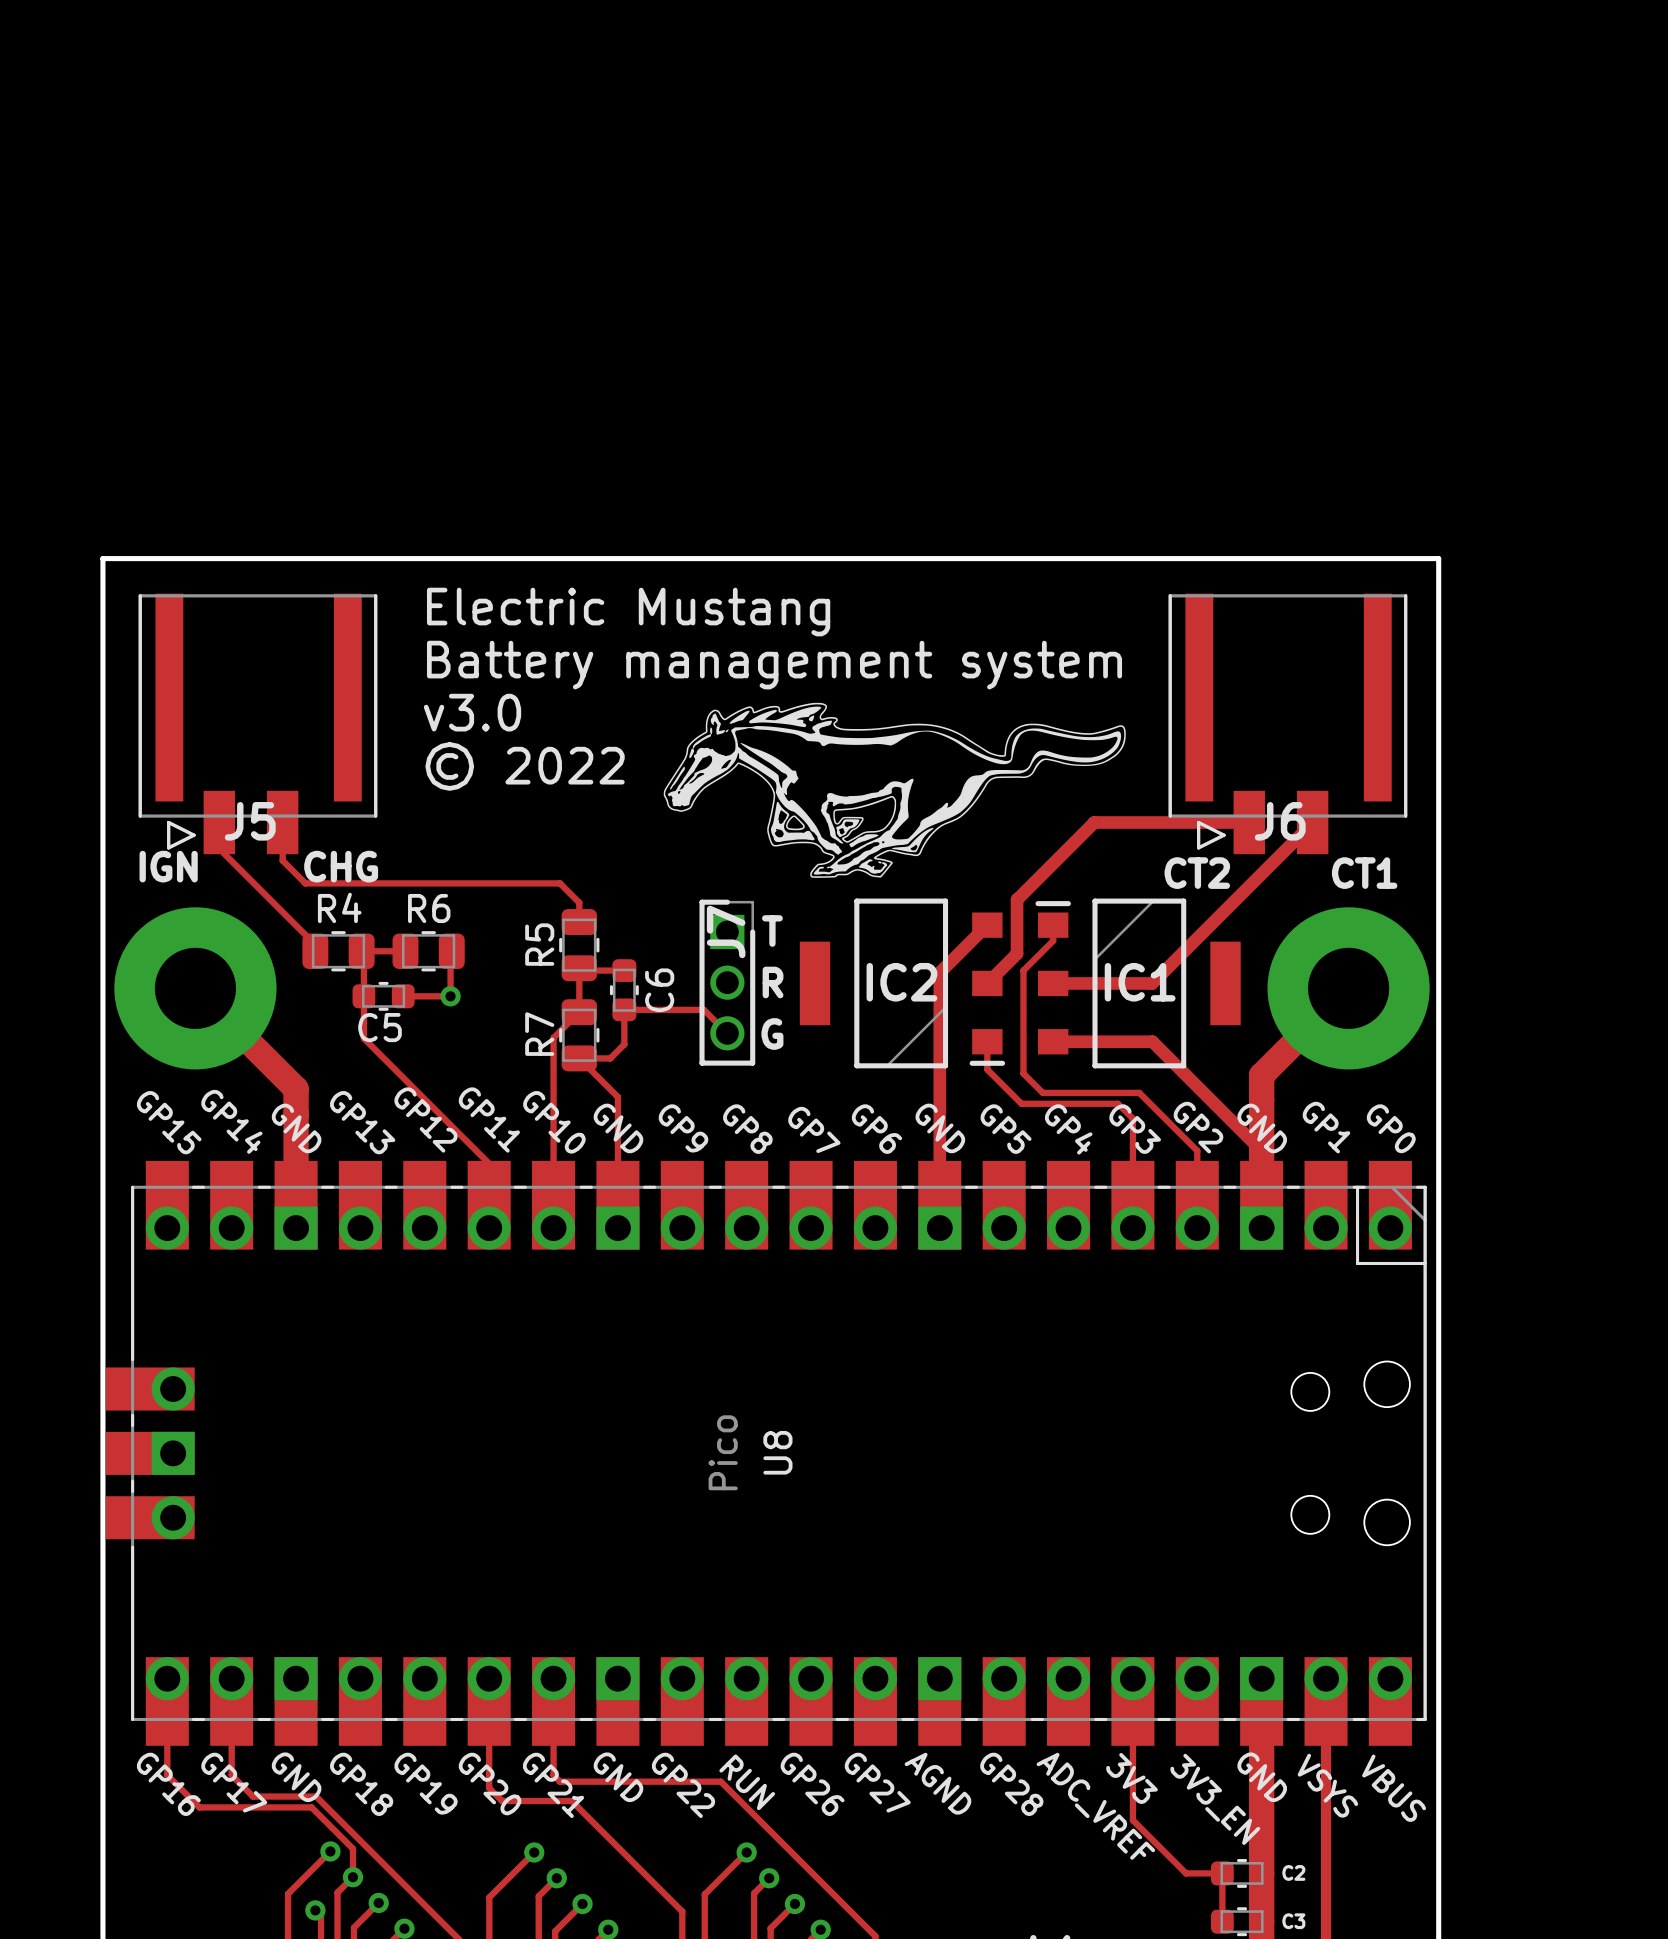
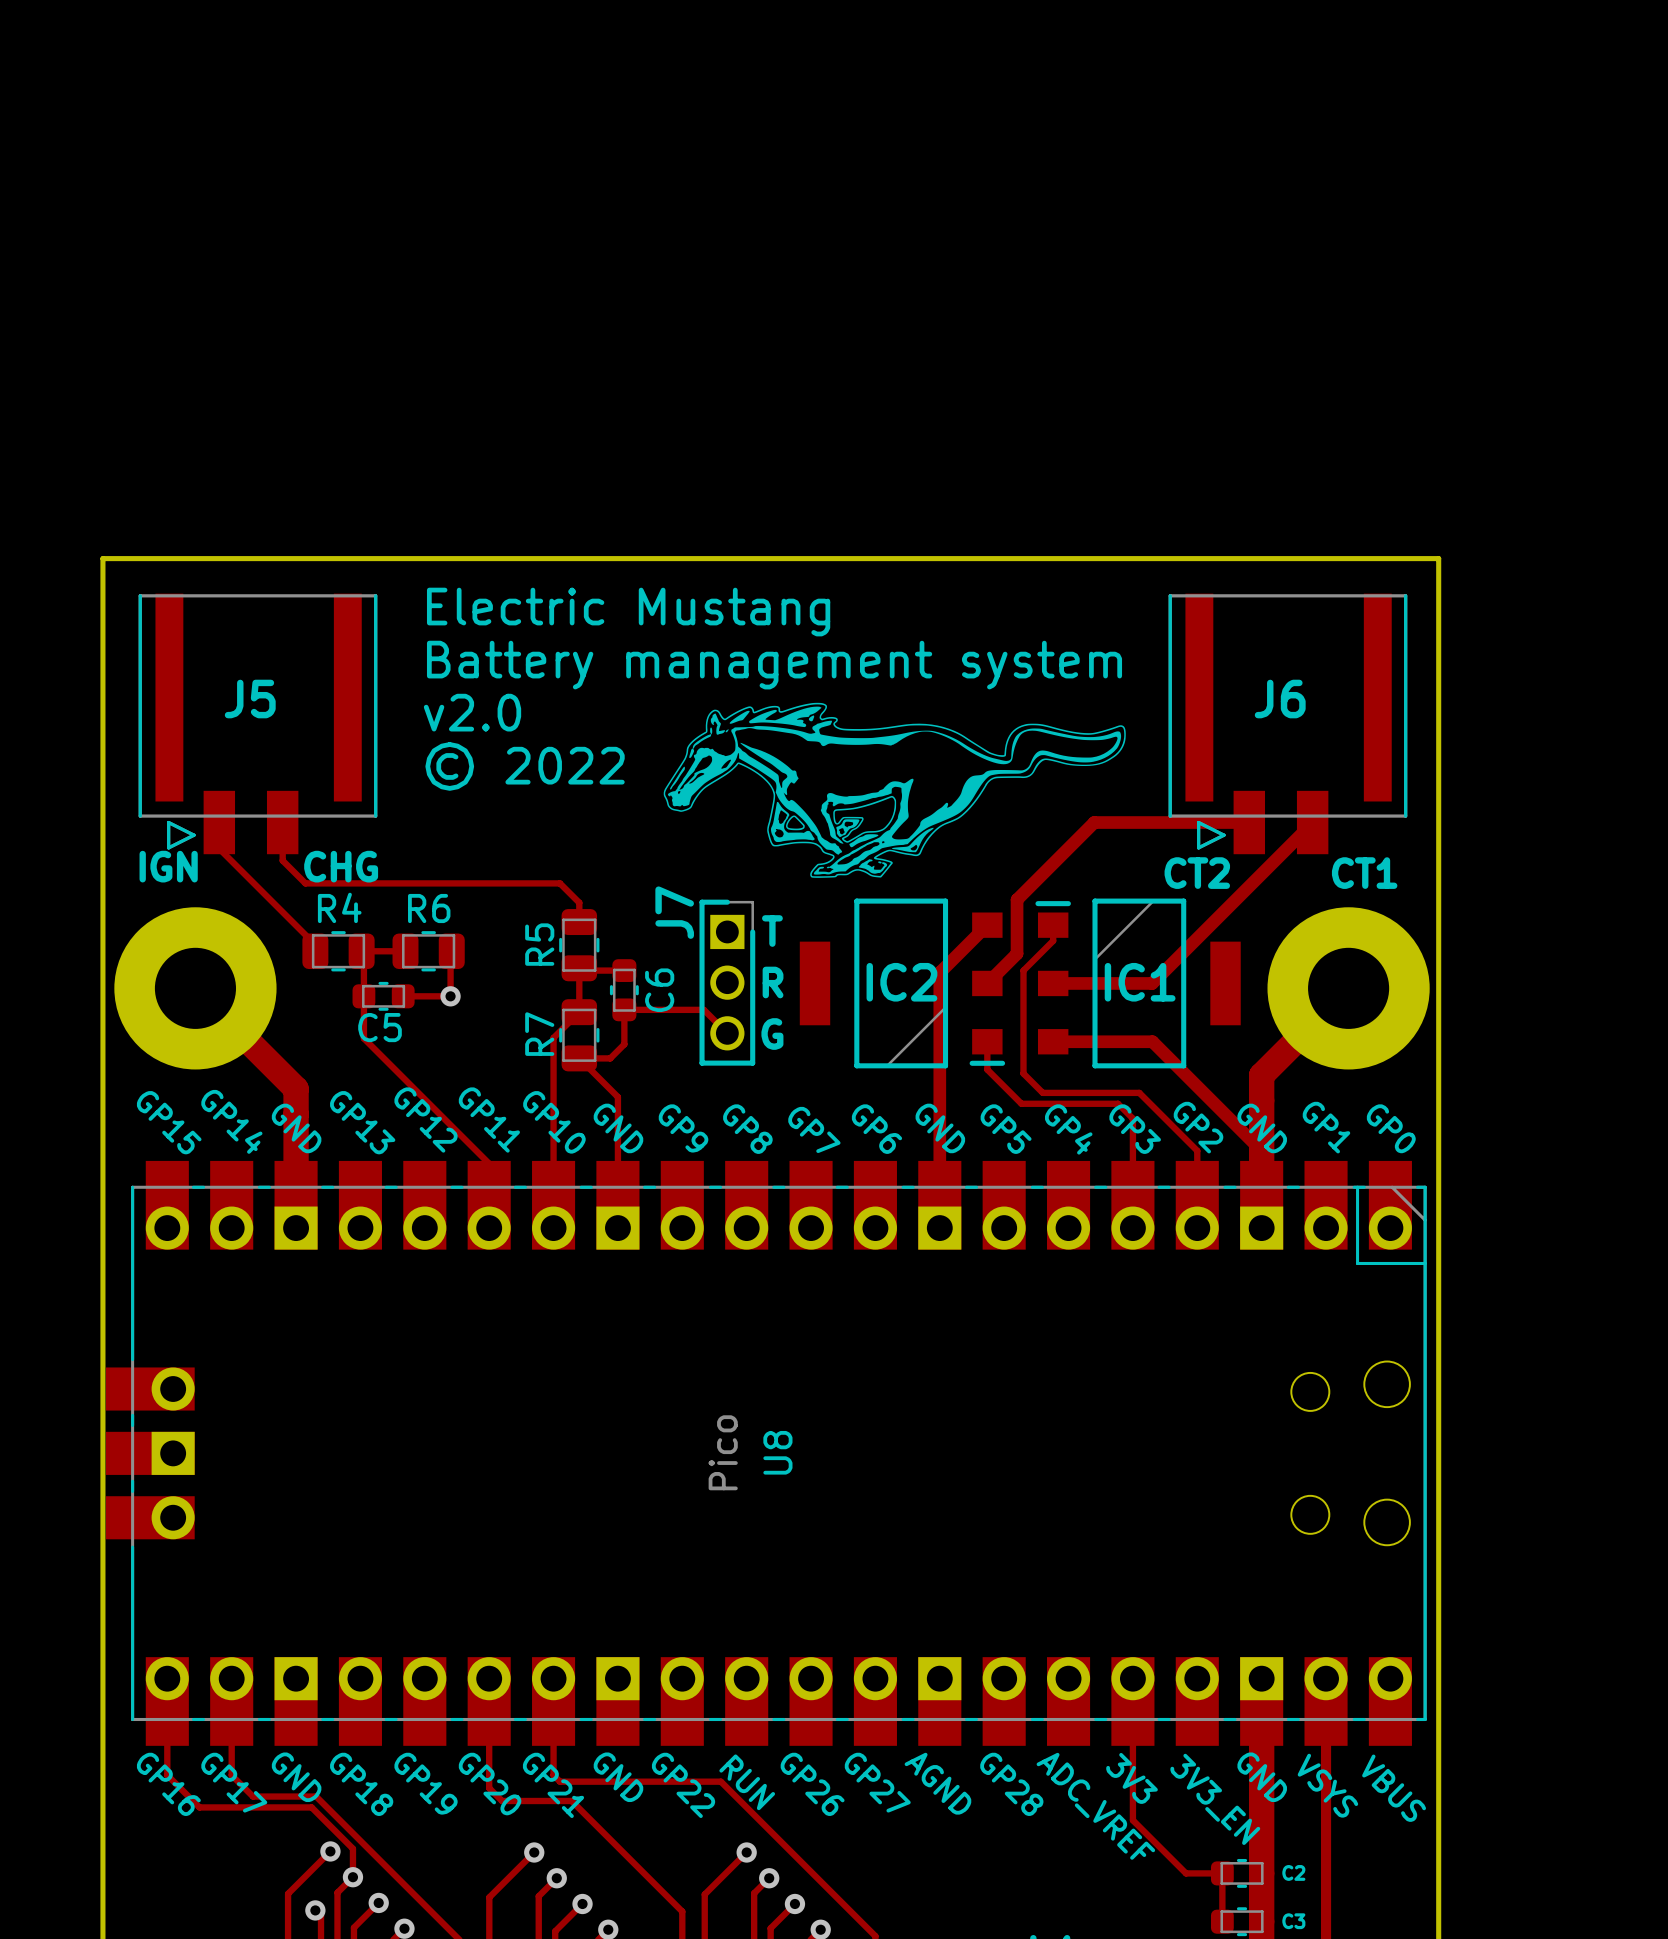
text: v3.0 (472, 712) -> v2.0 (472, 712)
J5 name position: J5 (250, 821) -> J5 (250, 699)
J6 name position: J6 (1280, 821) -> J6 (1280, 699)
J7 name position: J7 (726, 931) -> J7 (674, 912)

